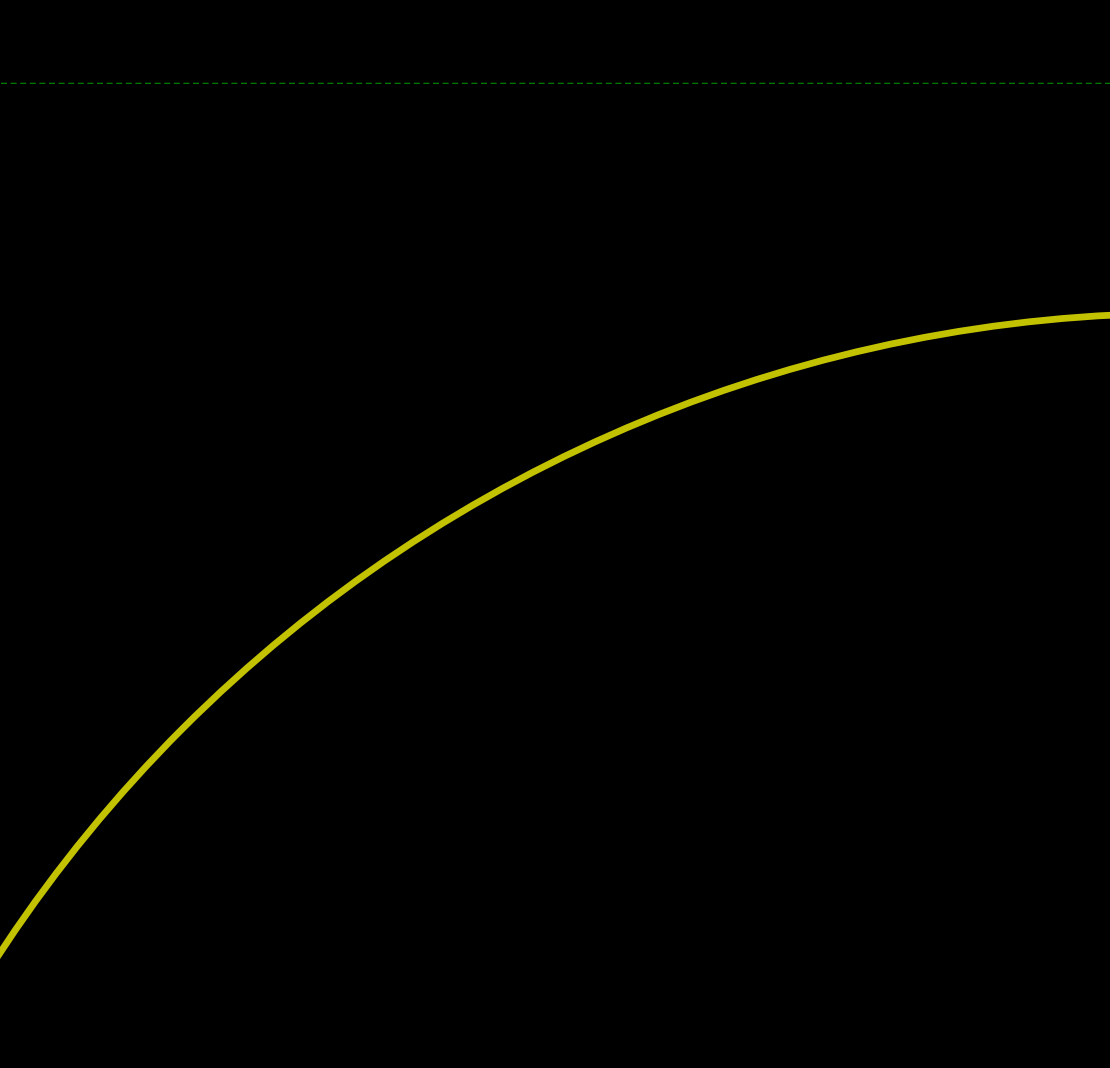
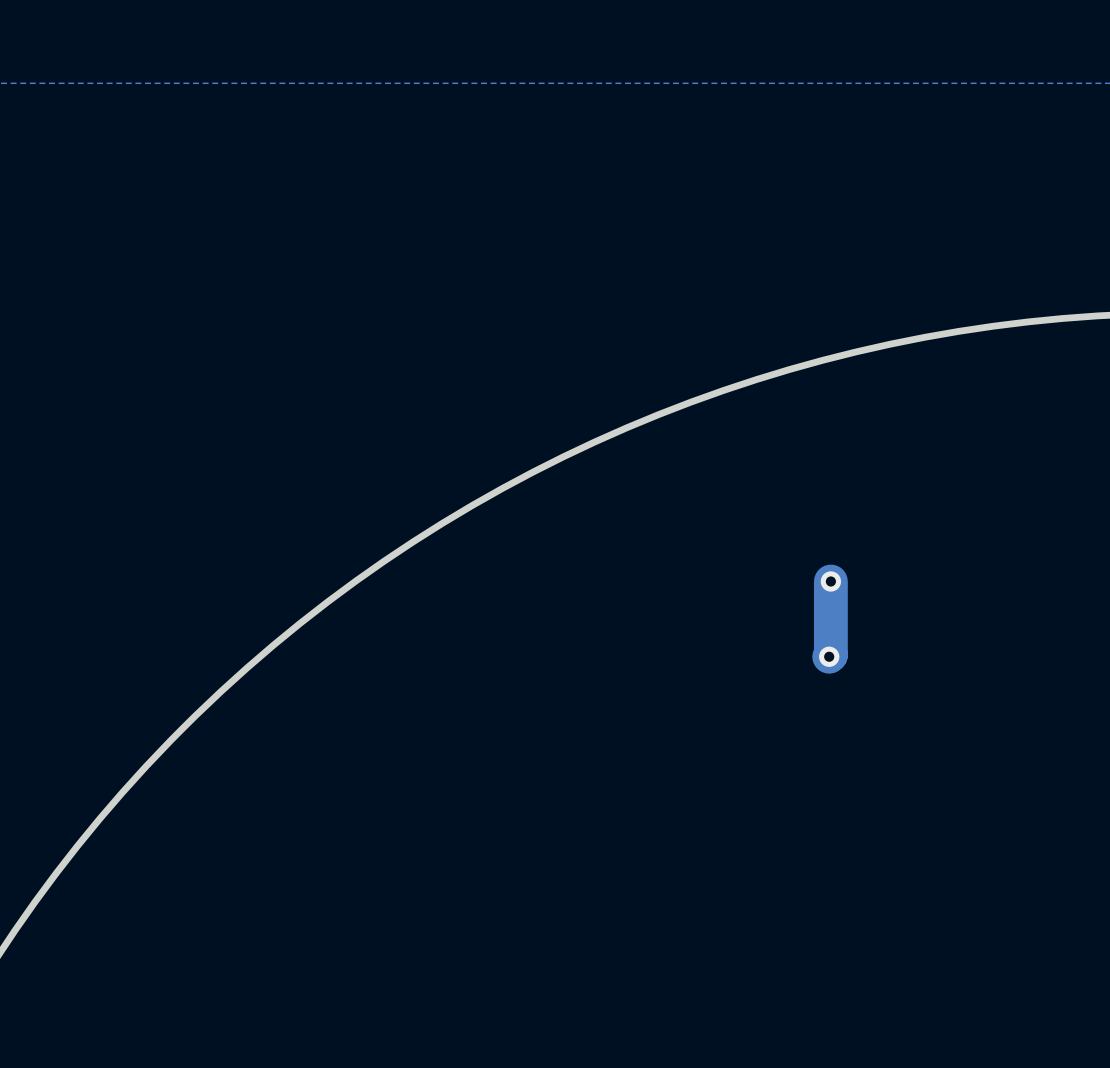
track: none -> (830, 581) (830, 655) (829, 656)
via: none -> (830, 581)
via: none -> (829, 656)

